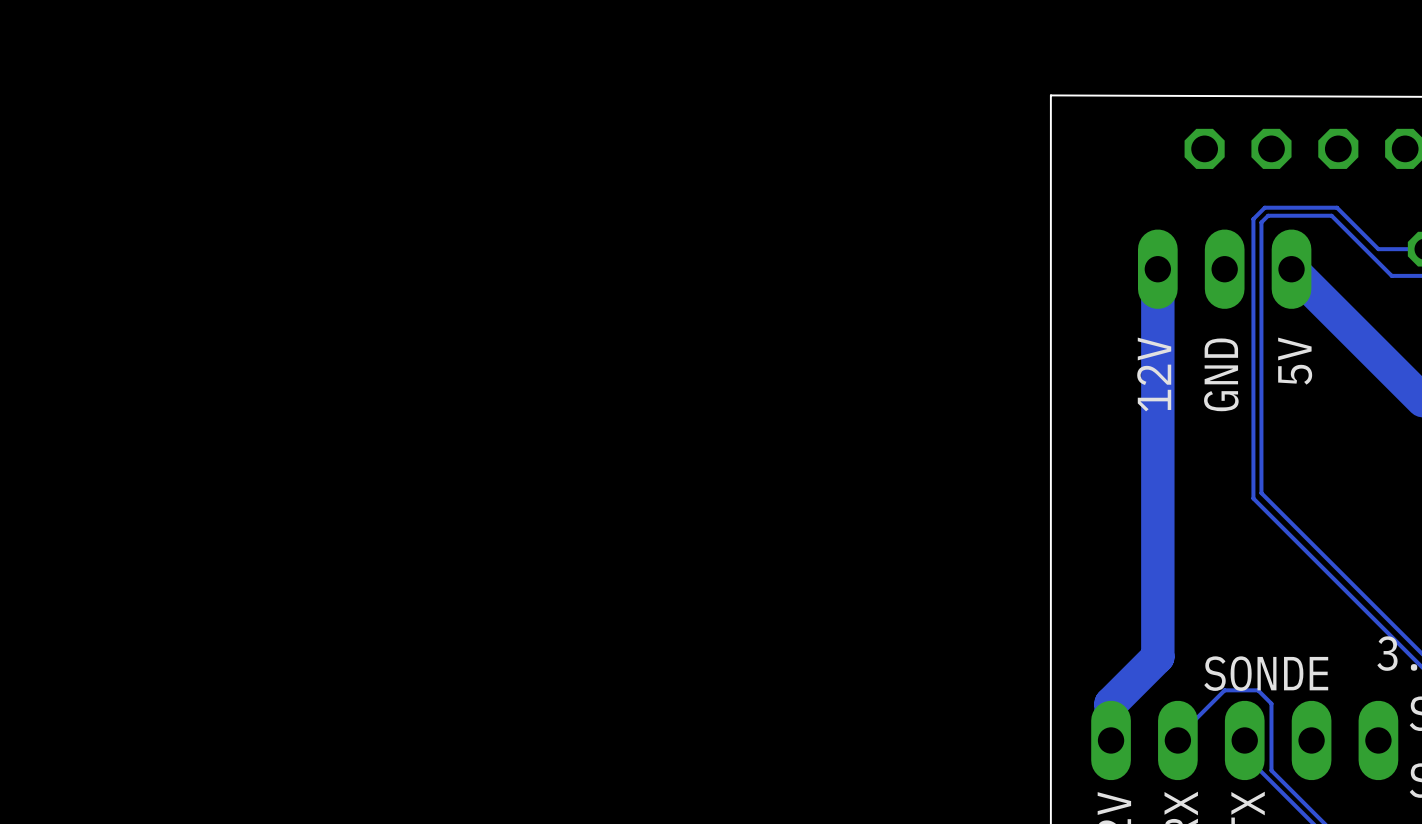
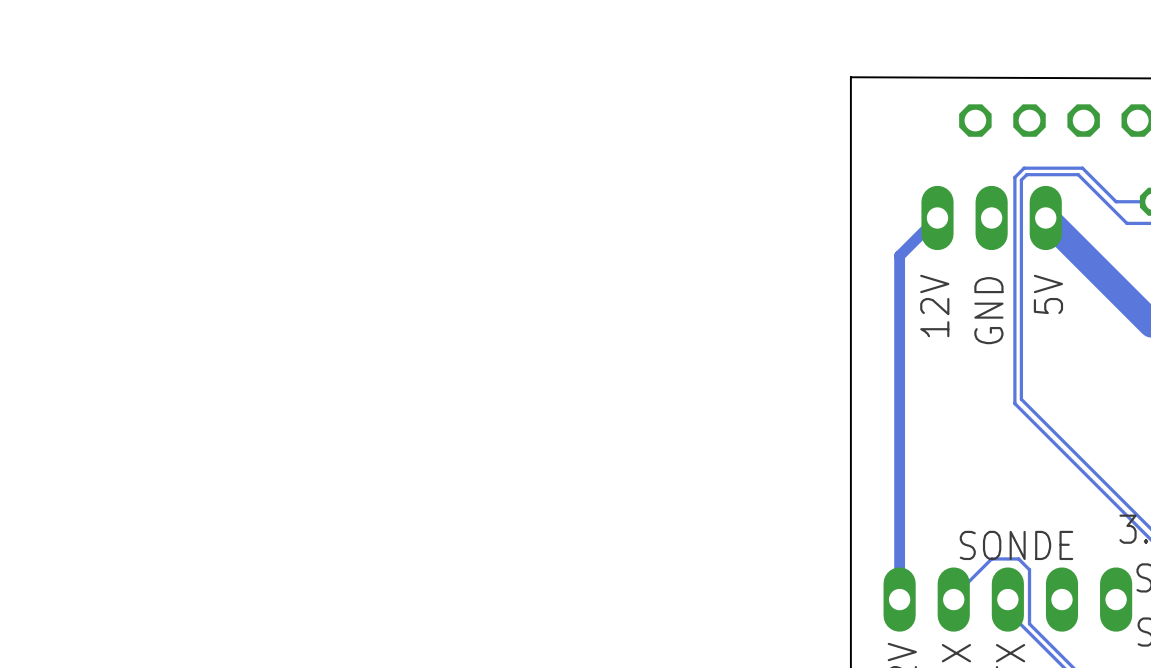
track: (1157, 269) (1157, 656) (1111, 703) -> (937, 217) (899, 255) (899, 569)

